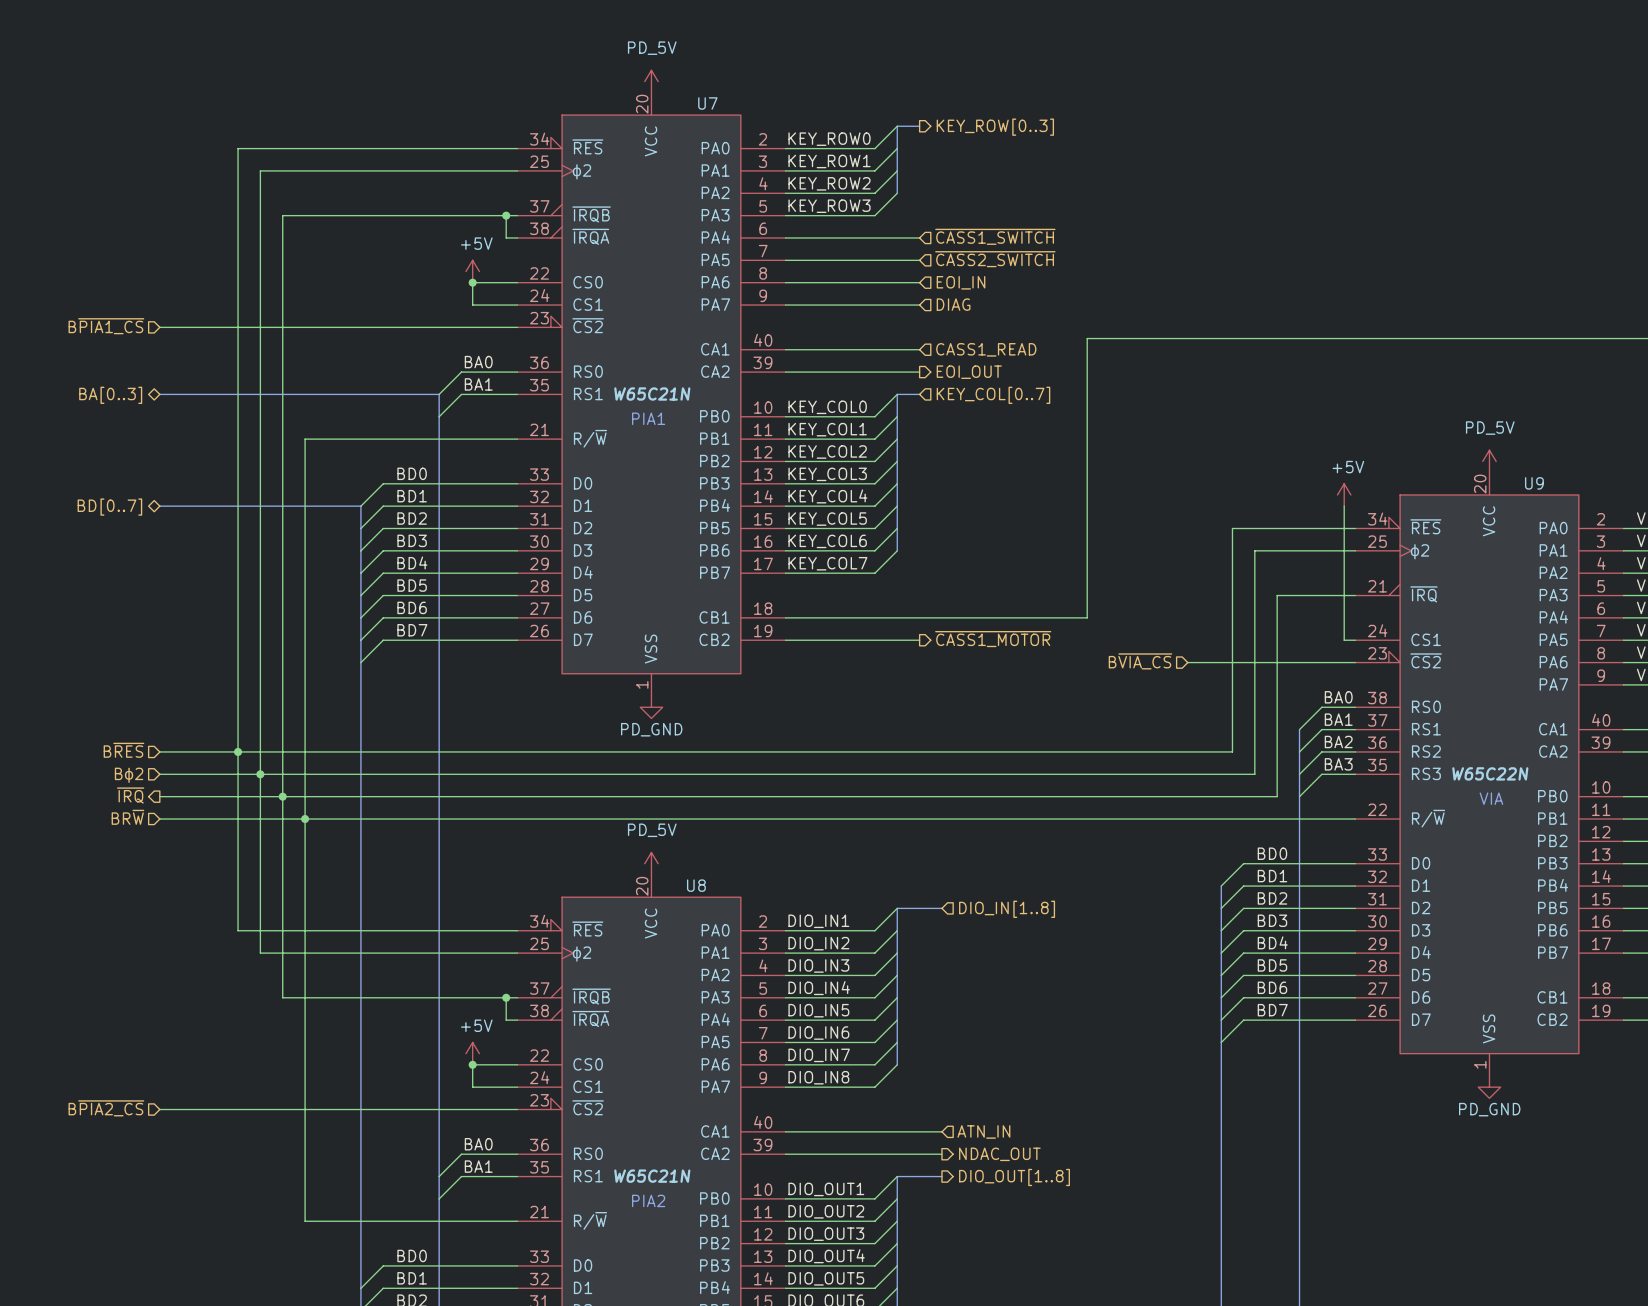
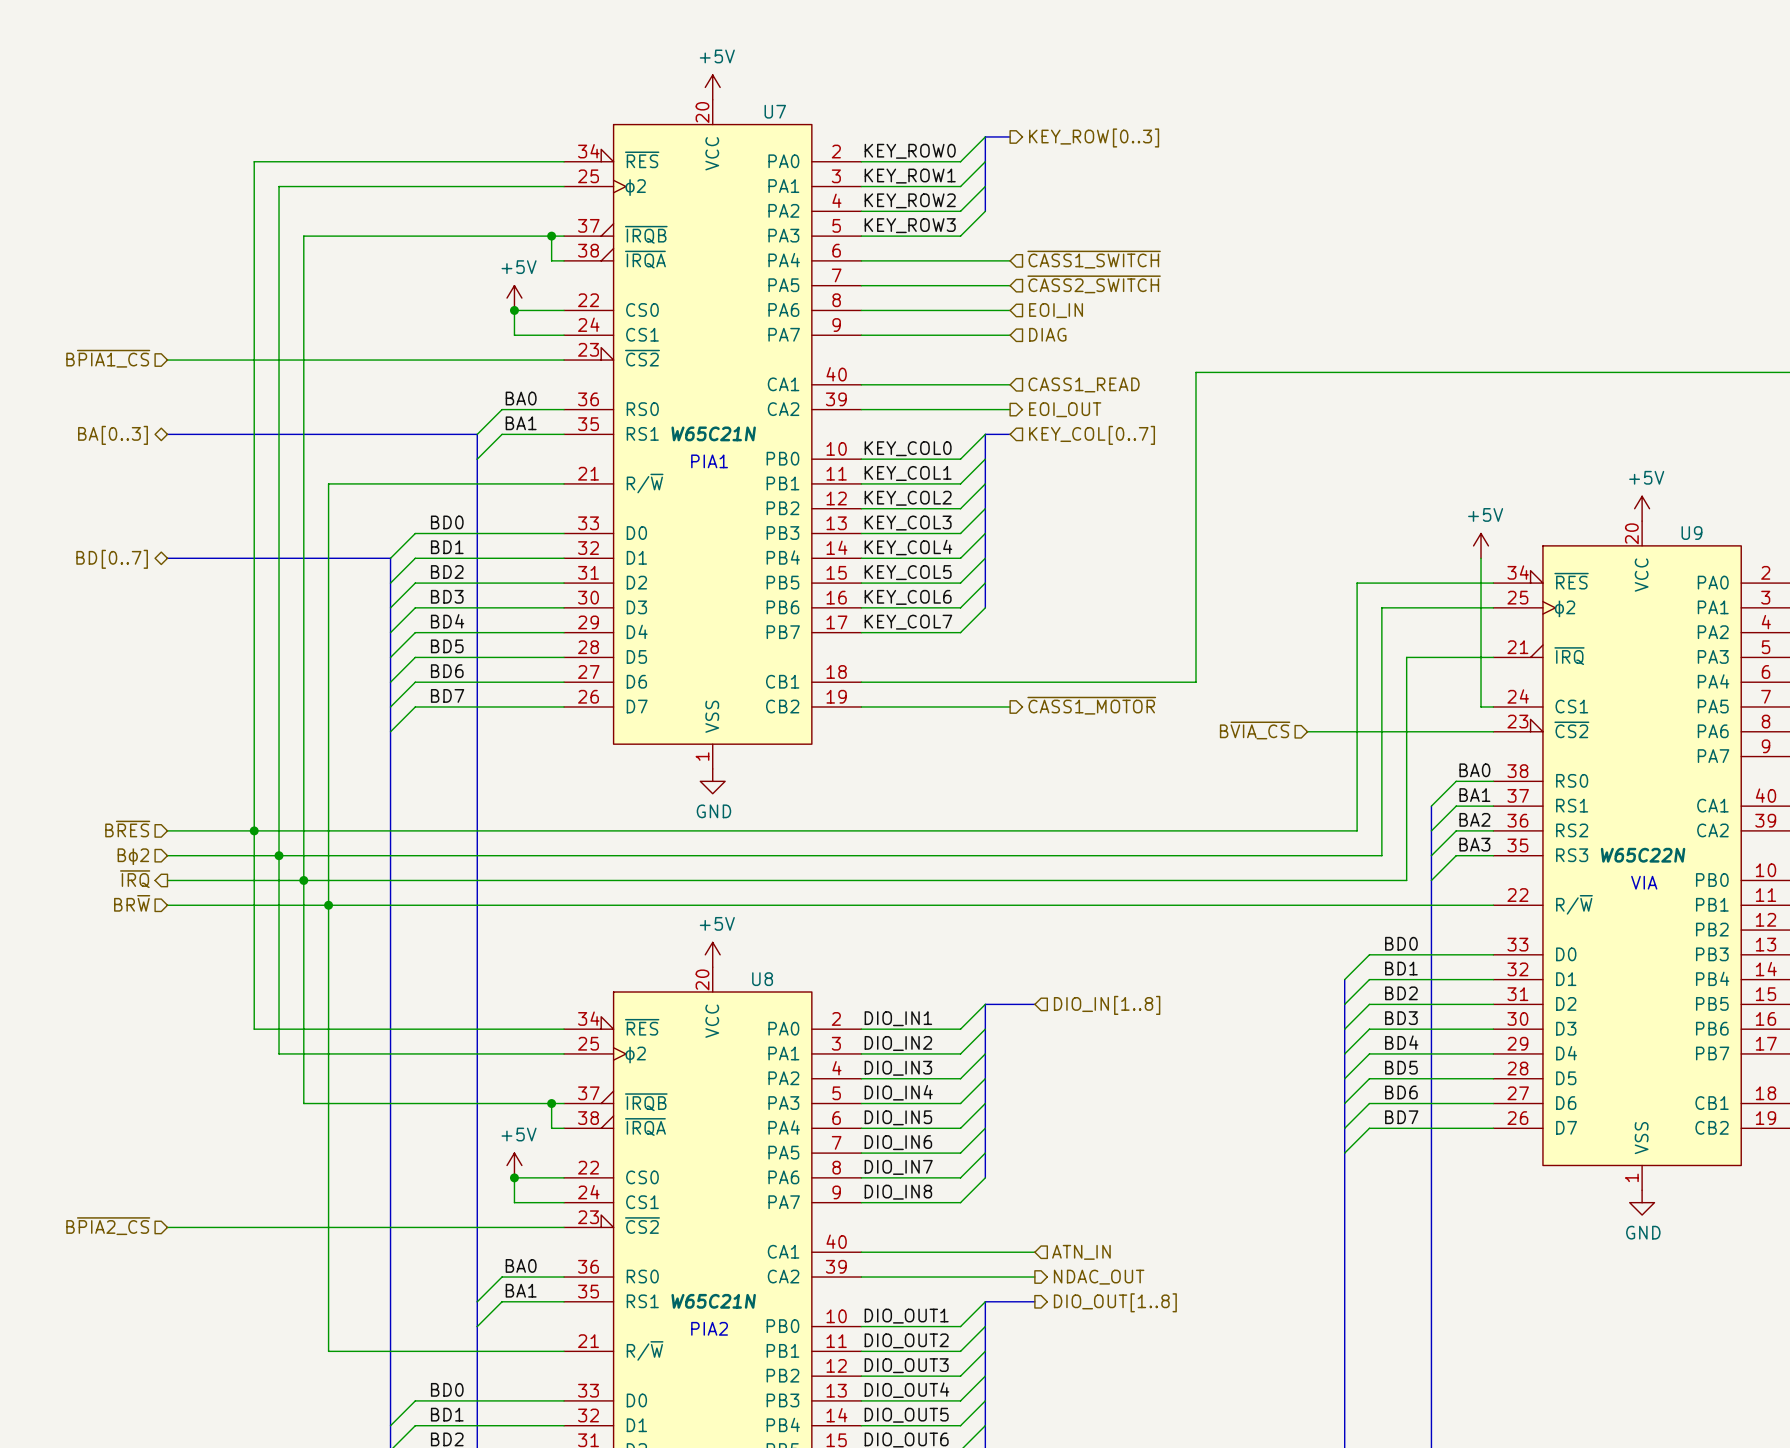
power symbol: PD_5V (651, 81) -> +5V (712, 87)
power symbol: PD_5V (1489, 461) -> +5V (1642, 508)
power symbol: PD_GND (651, 707) -> GND (712, 781)
power symbol: PD_5V (651, 863) -> +5V (712, 954)
power symbol: PD_GND (1489, 1087) -> GND (1642, 1202)

